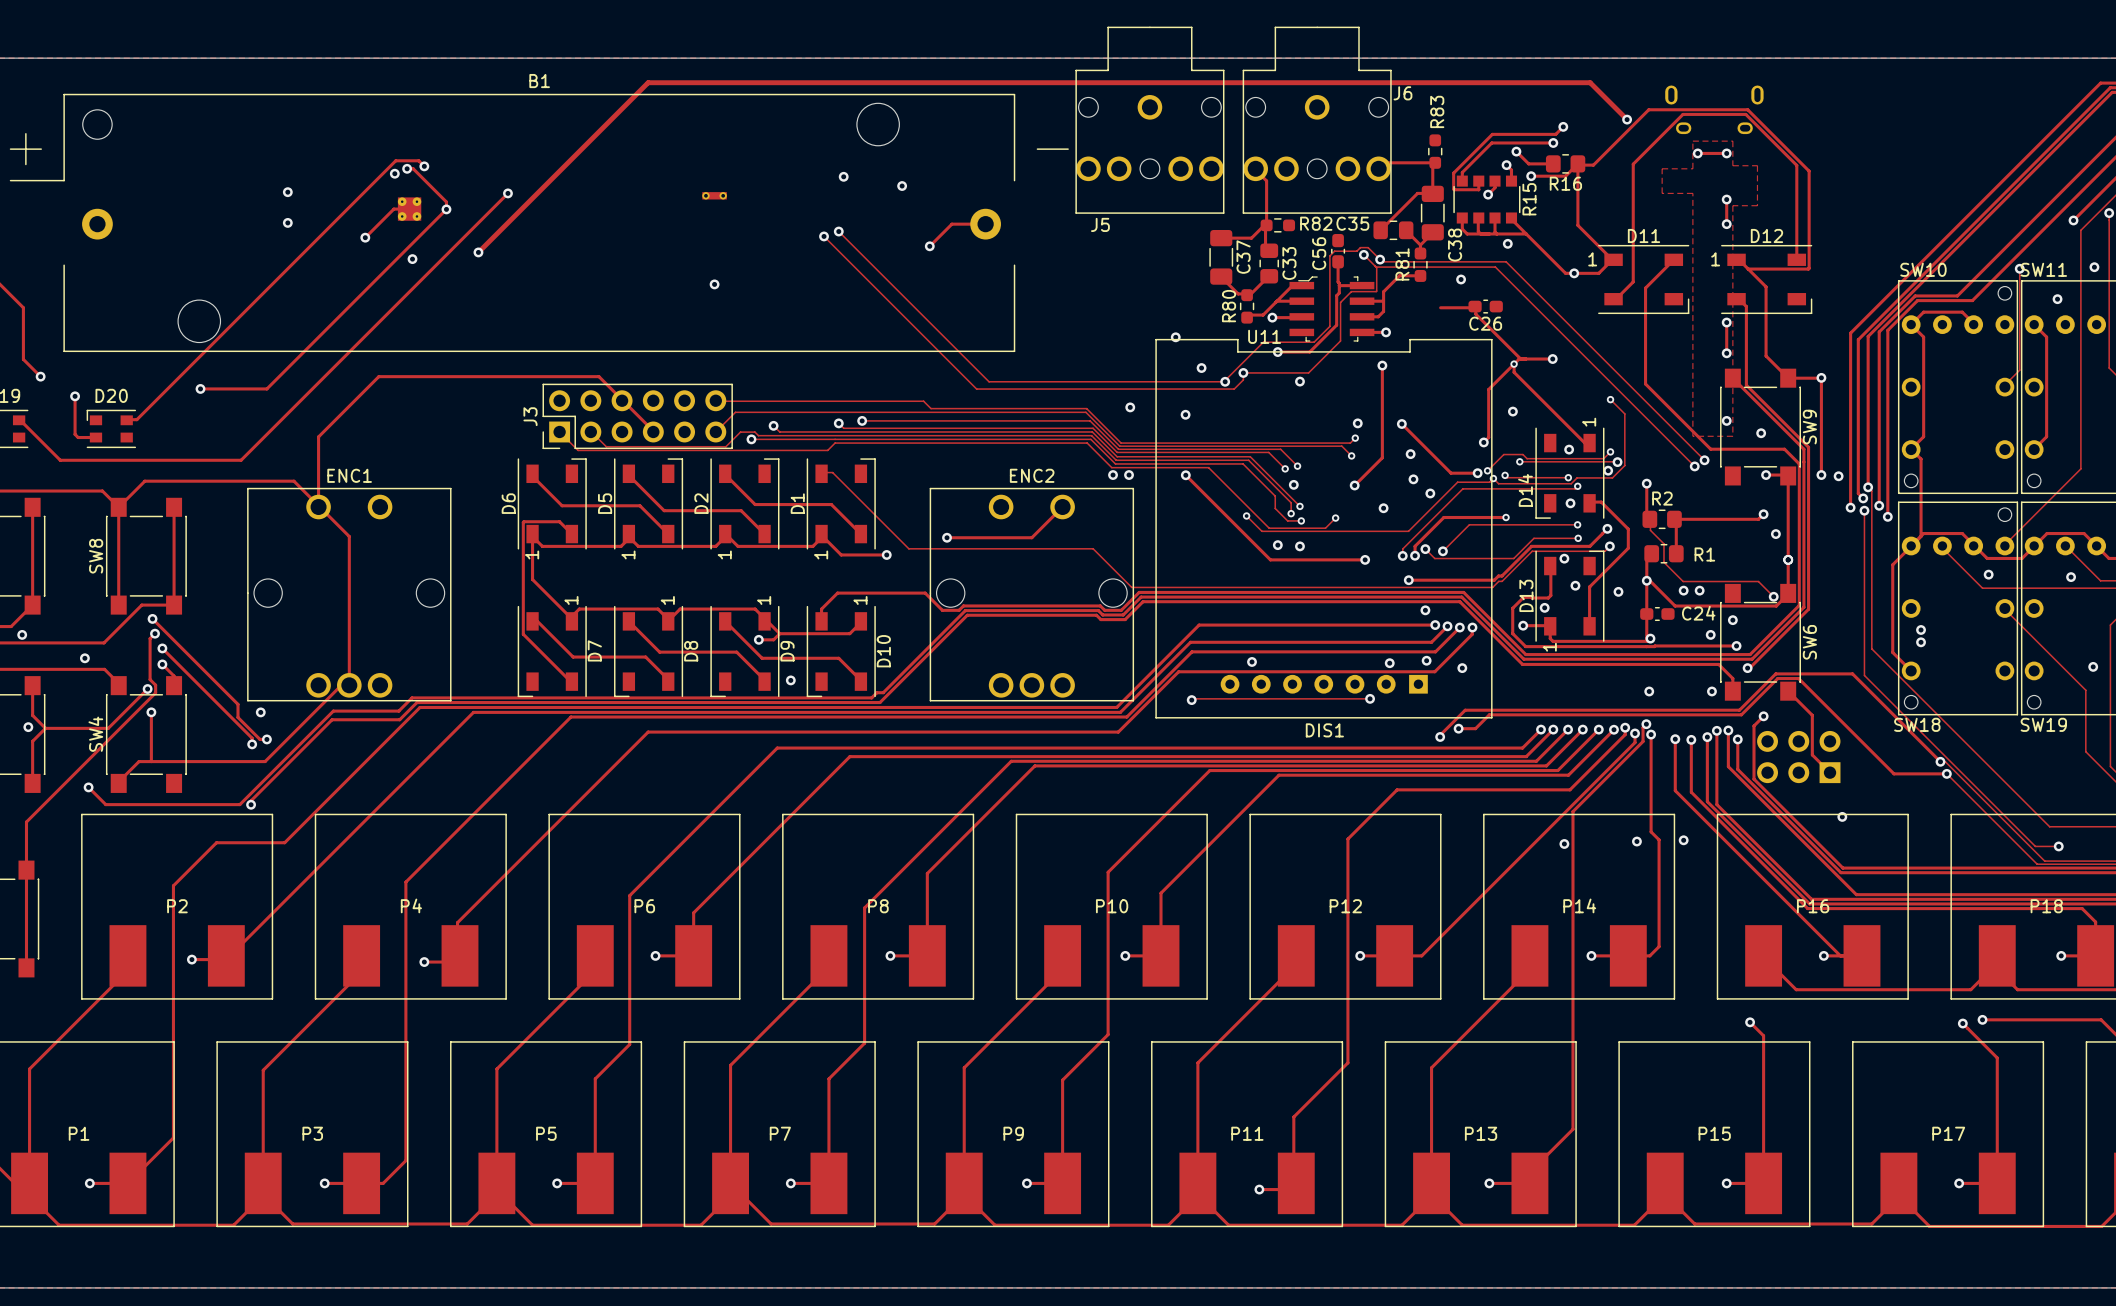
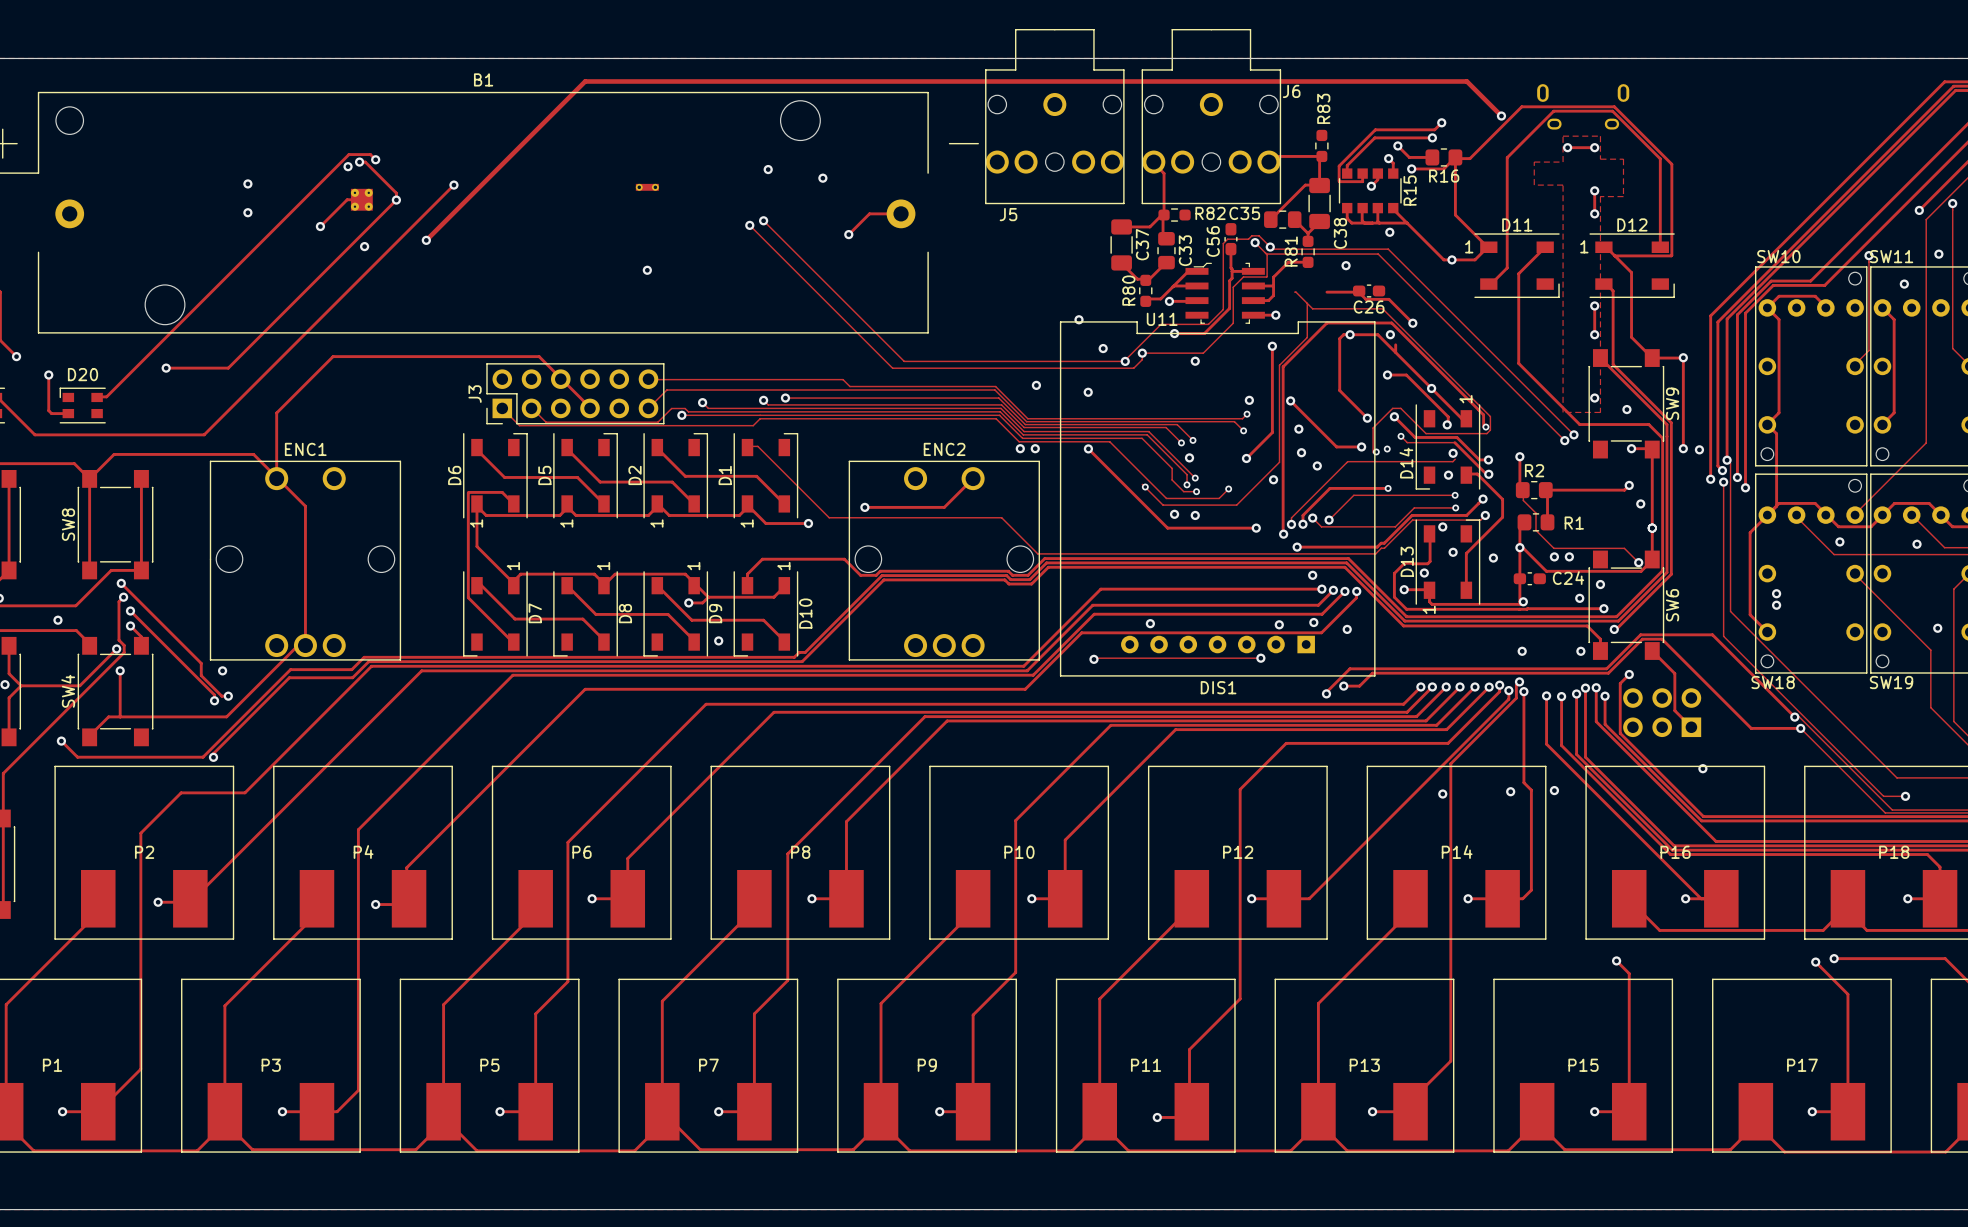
track: none -> (1294, 292) (1312, 308) (1382, 308) (1490, 416) (1490, 430) (1486, 433) (1426, 433) (1400, 408) (1392, 408) (1373, 427) (1373, 452)
track: (1475, 309) (1475, 314) (1520, 359) -> (1359, 293) (1365, 299) (1388, 299) (1412, 323)
track: none -> (1307, 303) (1307, 337) (1279, 365) (1279, 462) (1236, 505) (1163, 505) (1142, 484)
via: none -> (1412, 323)
via: none -> (1350, 334)
via: none -> (1390, 334)
track: (1552, 359) (1519, 359) (1488, 389) (1488, 437) (1483, 442) -> (1395, 352) (1377, 334) (1343, 334) (1339, 338) (1339, 390) (1367, 418)
via: (1552, 359) -> none
via: (1514, 364) -> none
track: none -> (1387, 375) (1406, 375) (1448, 416) (1448, 423)
via: none -> (1387, 375)
track: (1610, 399) (1624, 413) (1624, 465) (1612, 477) (1577, 477) (1571, 483) (1498, 483) (1493, 478) (1489, 482) (1457, 482) (1408, 531) (1261, 531) (1246, 515) -> none
via: (1610, 399) -> none
via: none -> (1431, 388)
via: (1512, 411) -> none
track: none -> (1394, 416) (1415, 437) (1456, 437) (1479, 459) (1488, 459)
via: none -> (1394, 416)
track: none -> (1483, 426) (1483, 414) (1391, 322) (1326, 322) (1283, 366) (1283, 534)
track: (1610, 451) (1603, 458) (1527, 458) (1522, 454) (1503, 454) (1487, 470) -> none
track: (1519, 461) (1617, 462) -> (1401, 436) (1407, 442) (1454, 442) (1486, 474) (1488, 474)
via: (1617, 462) -> none
via: (1487, 470) -> none
via: (1608, 470) -> none
track: (1505, 475) (1507, 477) (1568, 477) -> none
via: (1568, 477) -> none
via: none -> (1453, 453)
via: (1577, 486) -> none
via: none -> (1488, 459)
via: none -> (1488, 474)
via: none -> (1283, 534)

